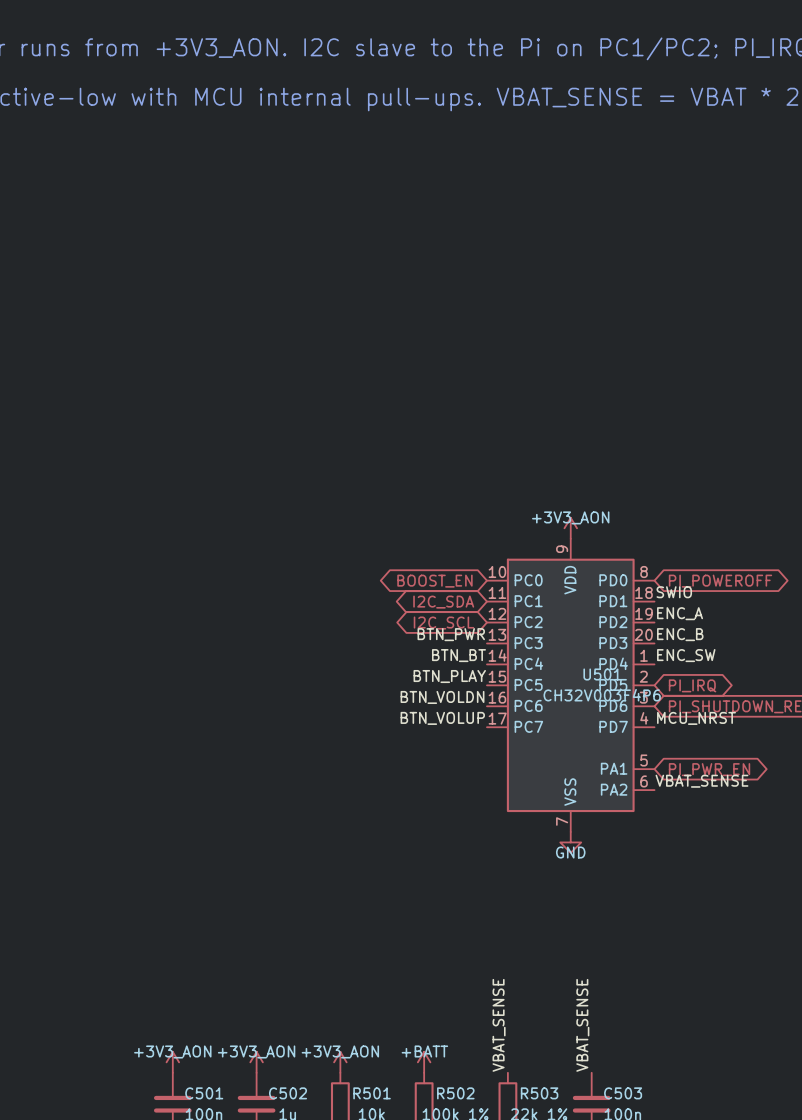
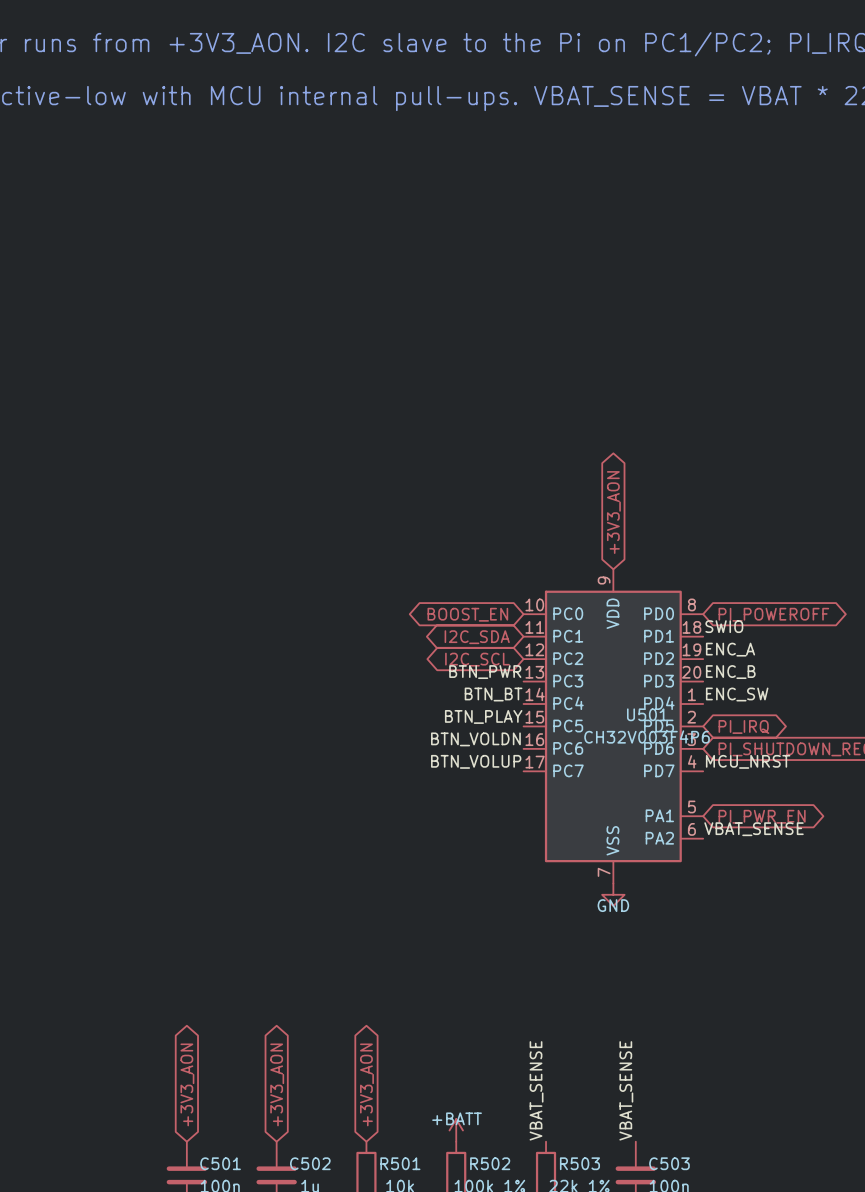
global label: none -> +3V3_AON (613, 512)
power symbol: +3V3_AON (570, 528) -> none
global label: none -> +3V3_AON (187, 1084)
global label: none -> +3V3_AON (277, 1084)
global label: none -> +3V3_AON (366, 1084)
power symbol: +3V3_AON (172, 1062) -> none
power symbol: +3V3_AON (256, 1062) -> none
power symbol: +3V3_AON (340, 1062) -> none

